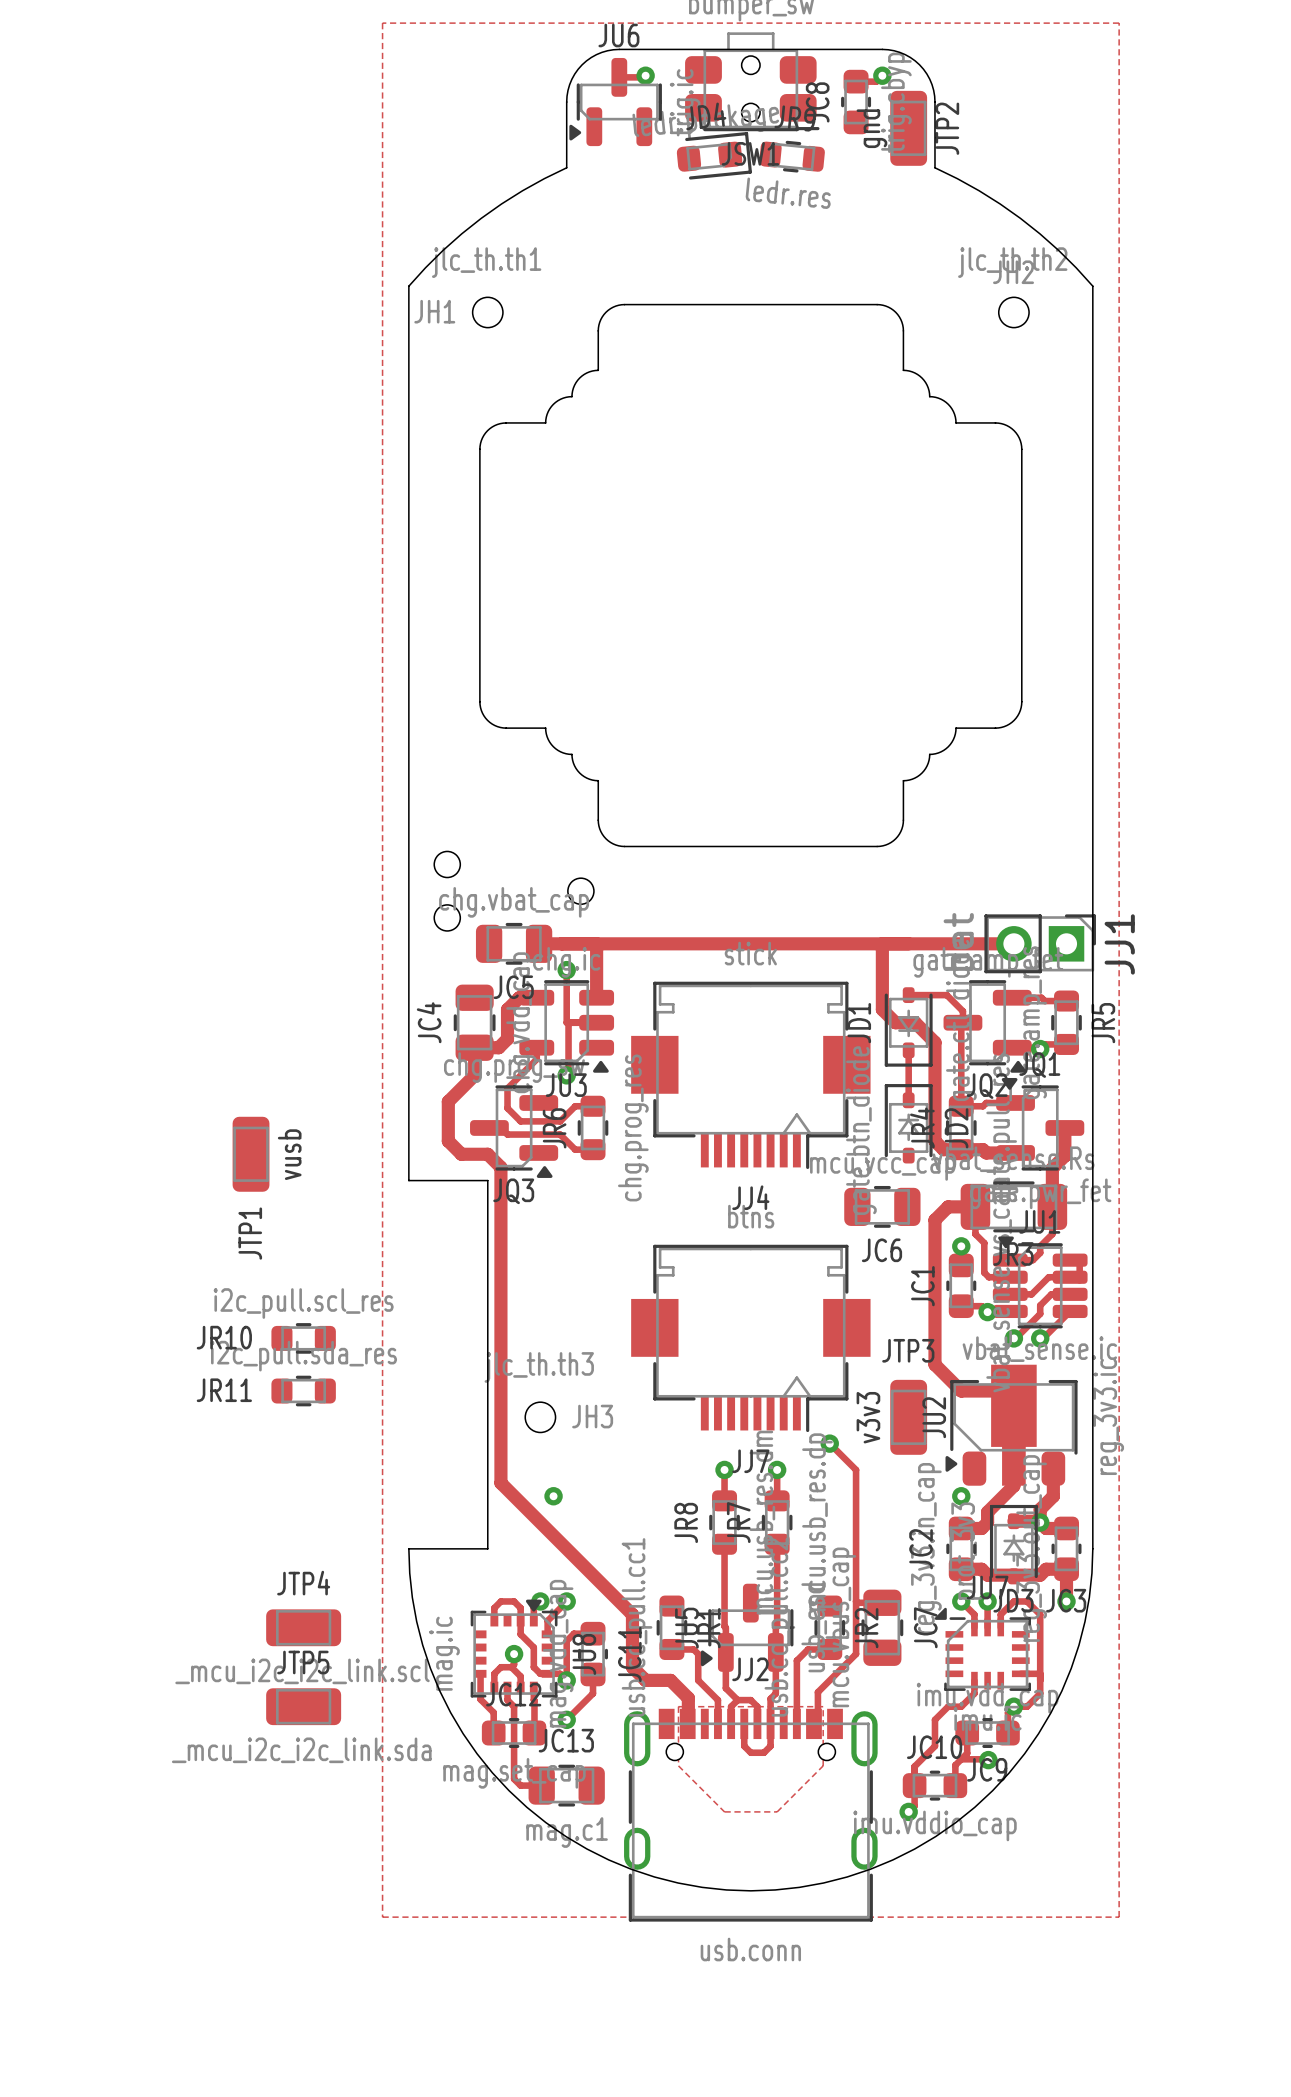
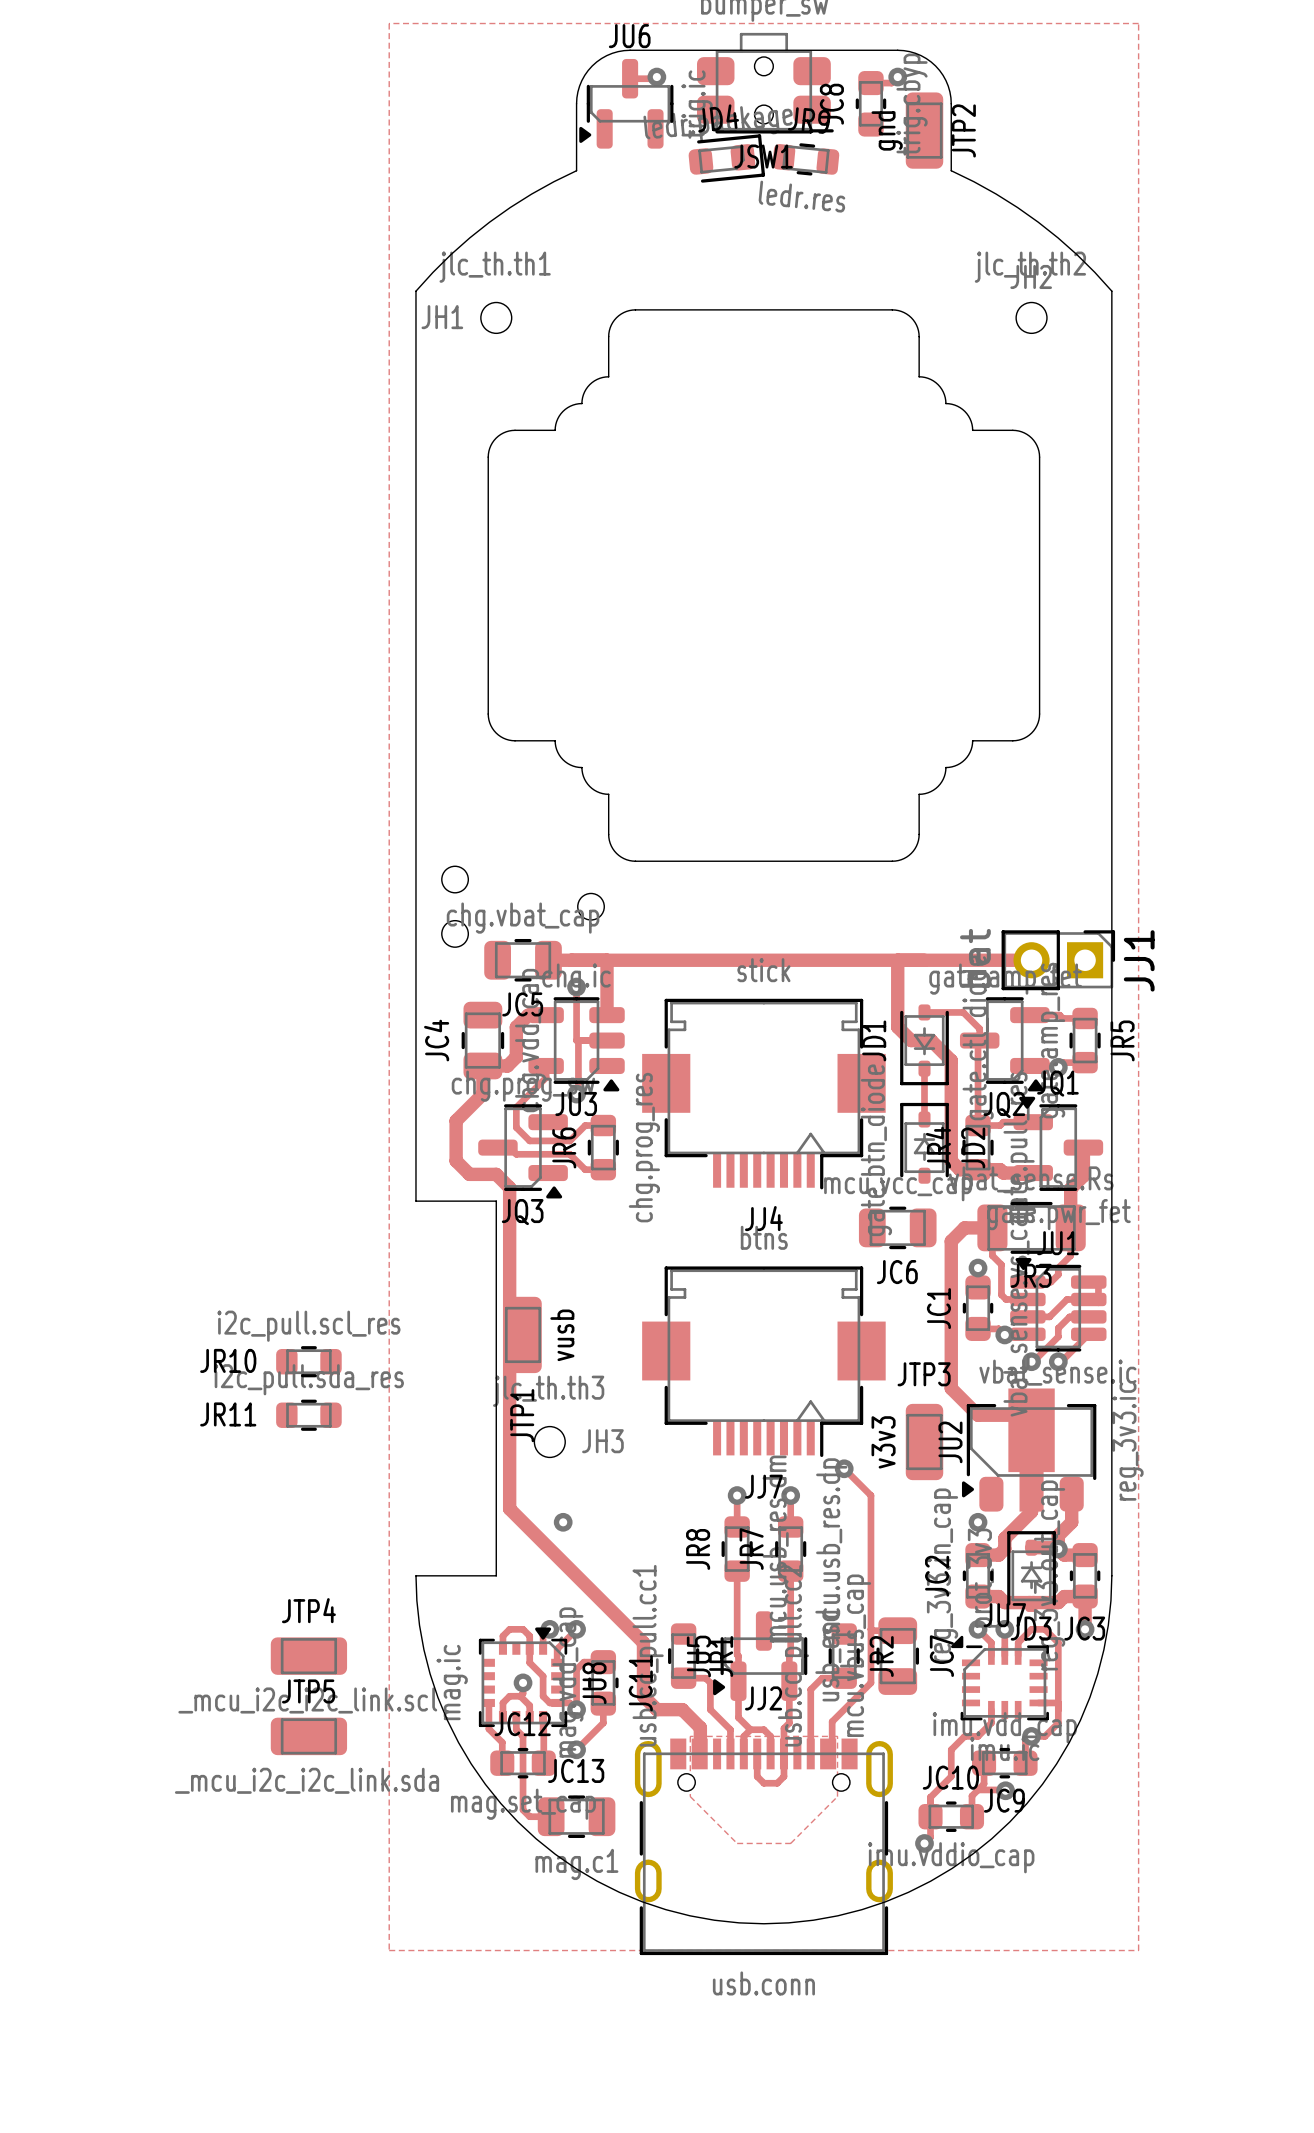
JTP1 position: (251, 1154) -> (523, 1334)

